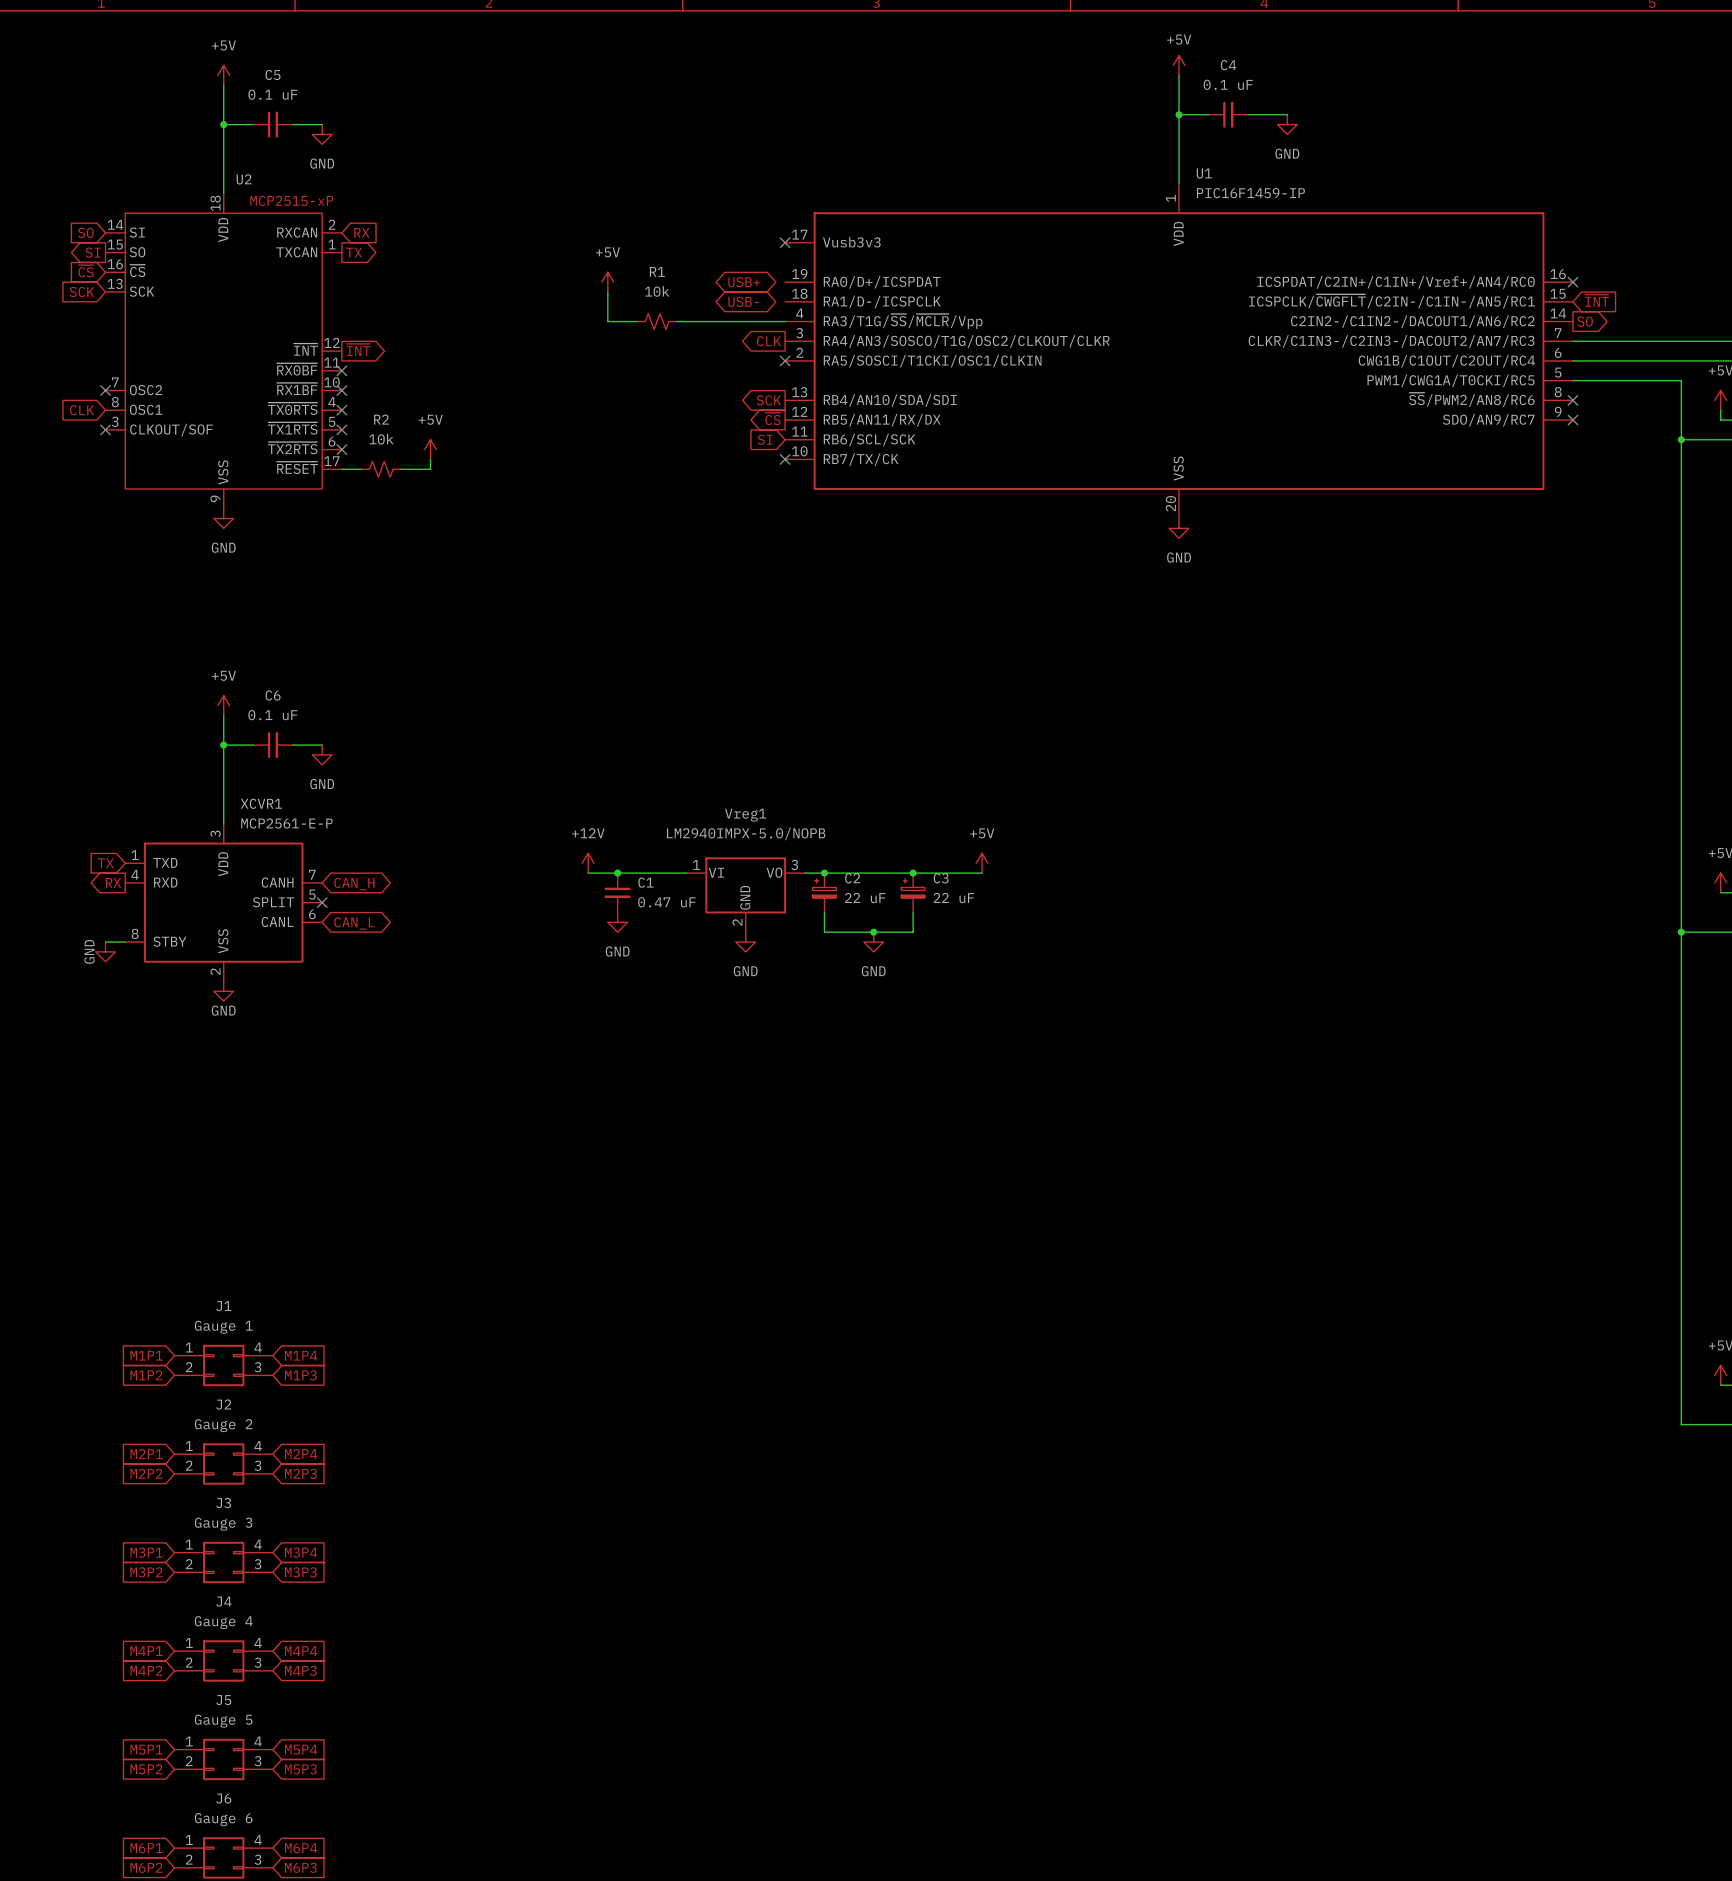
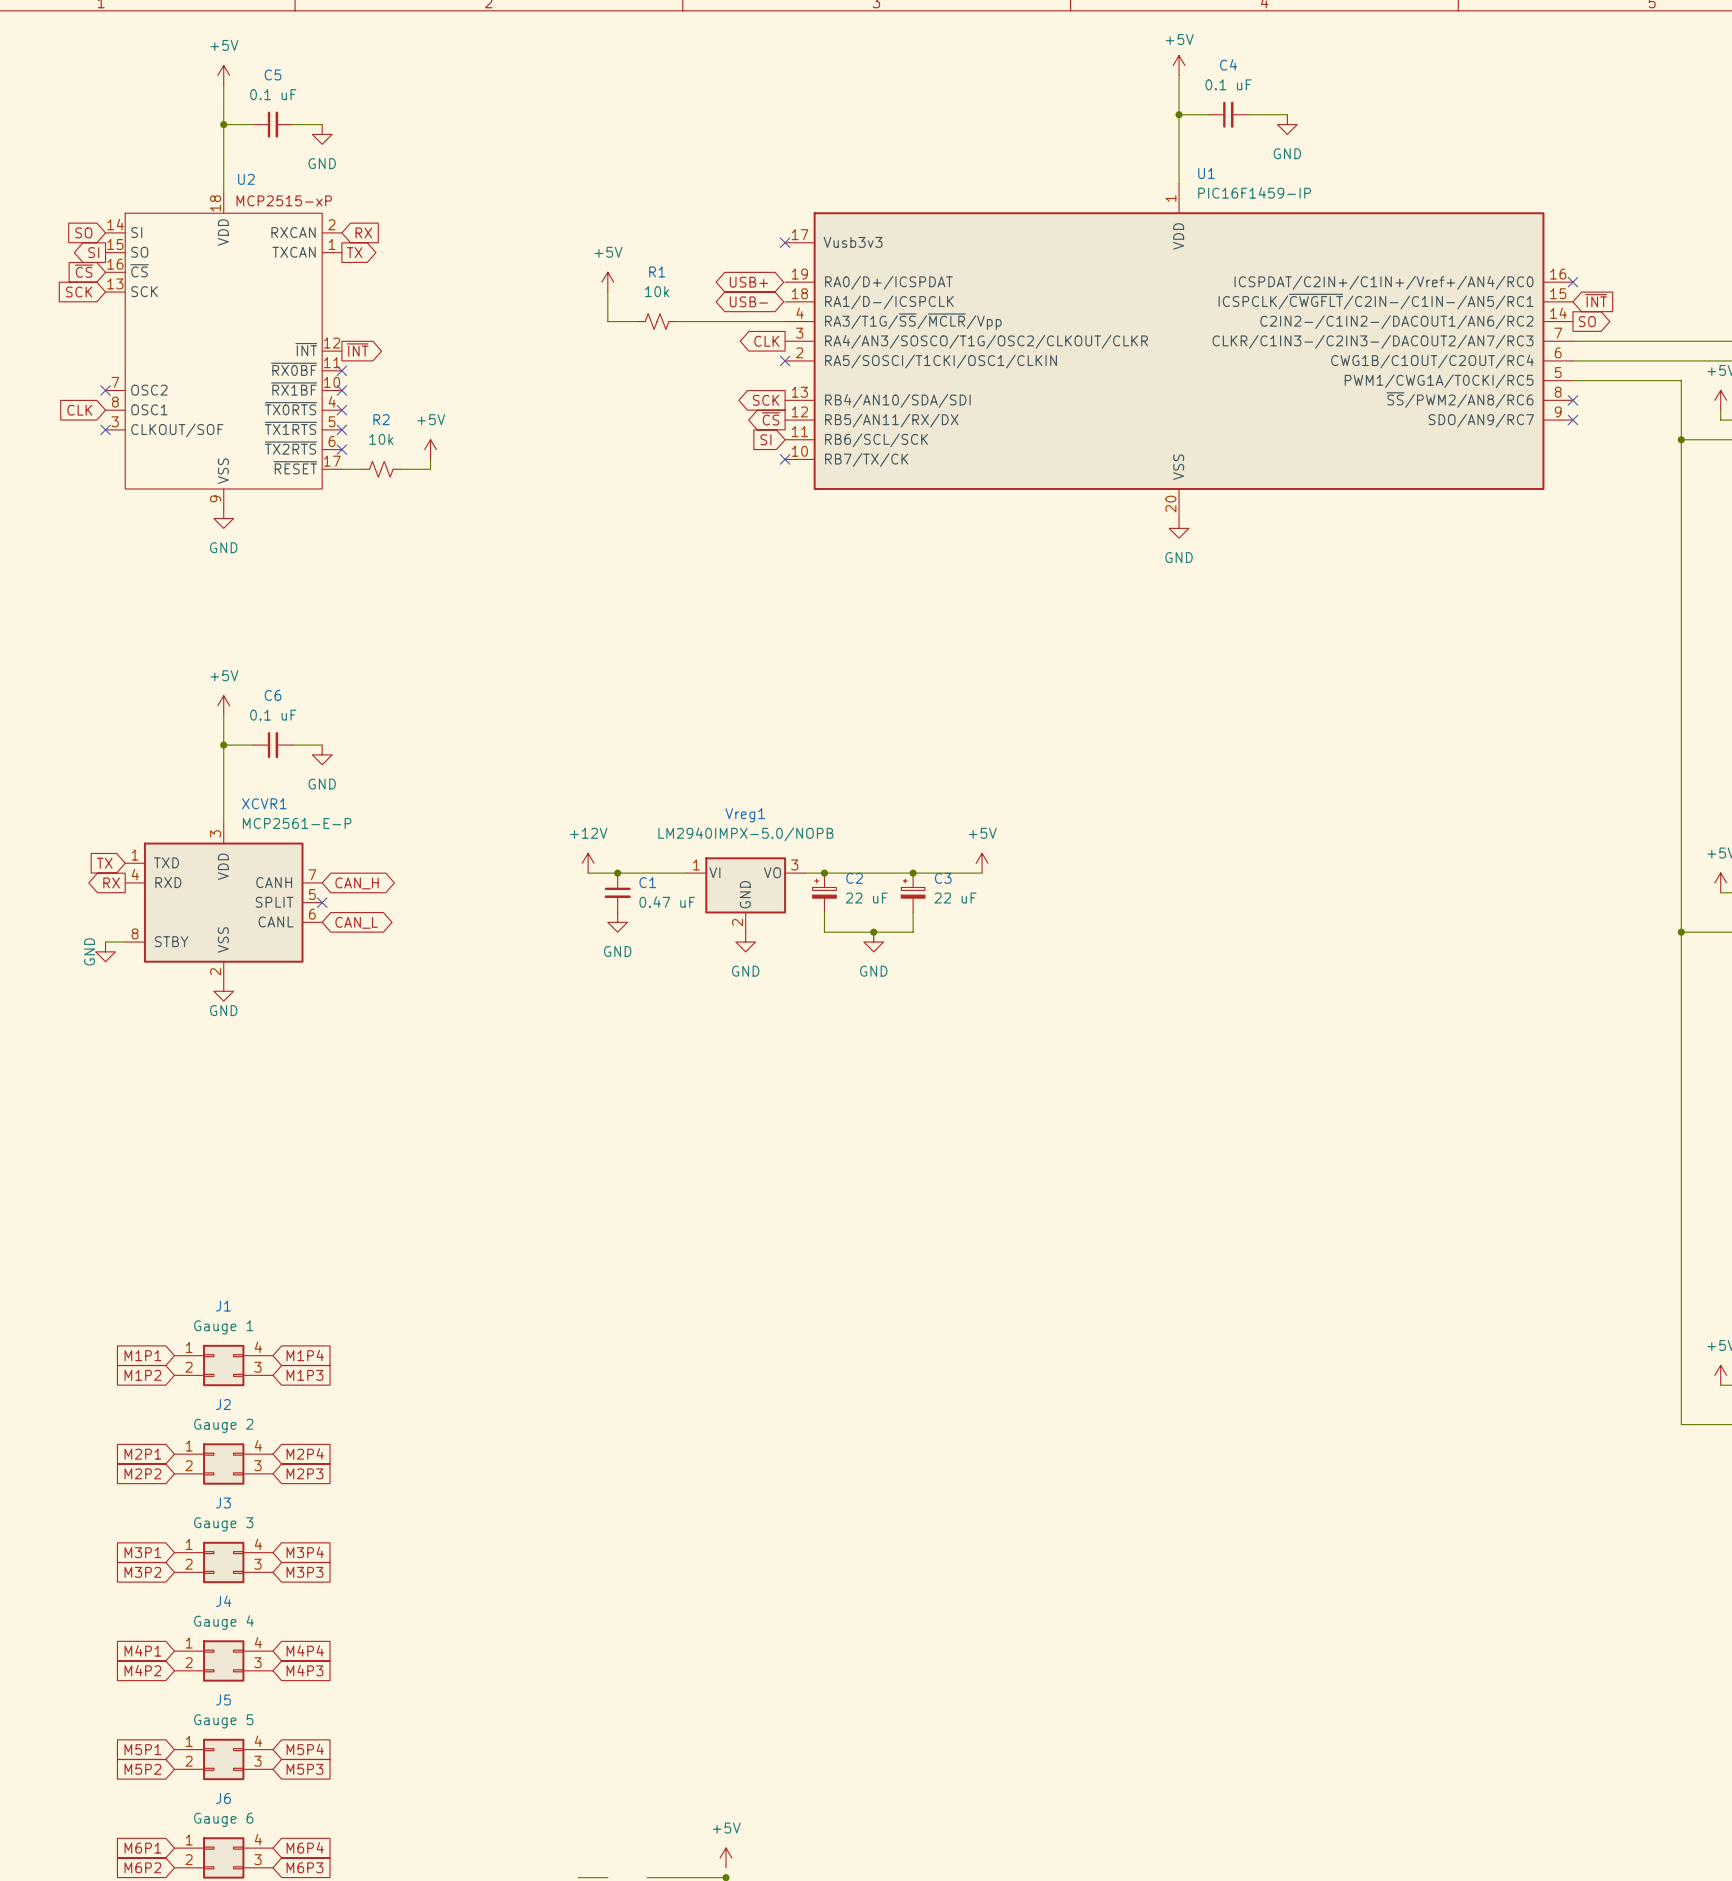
power symbol: none -> +5V (726, 1857)
wire: none -> (578, 1877) (607, 1877)
wire: none -> (647, 1877) (726, 1877)
junction: none -> (726, 1877)

